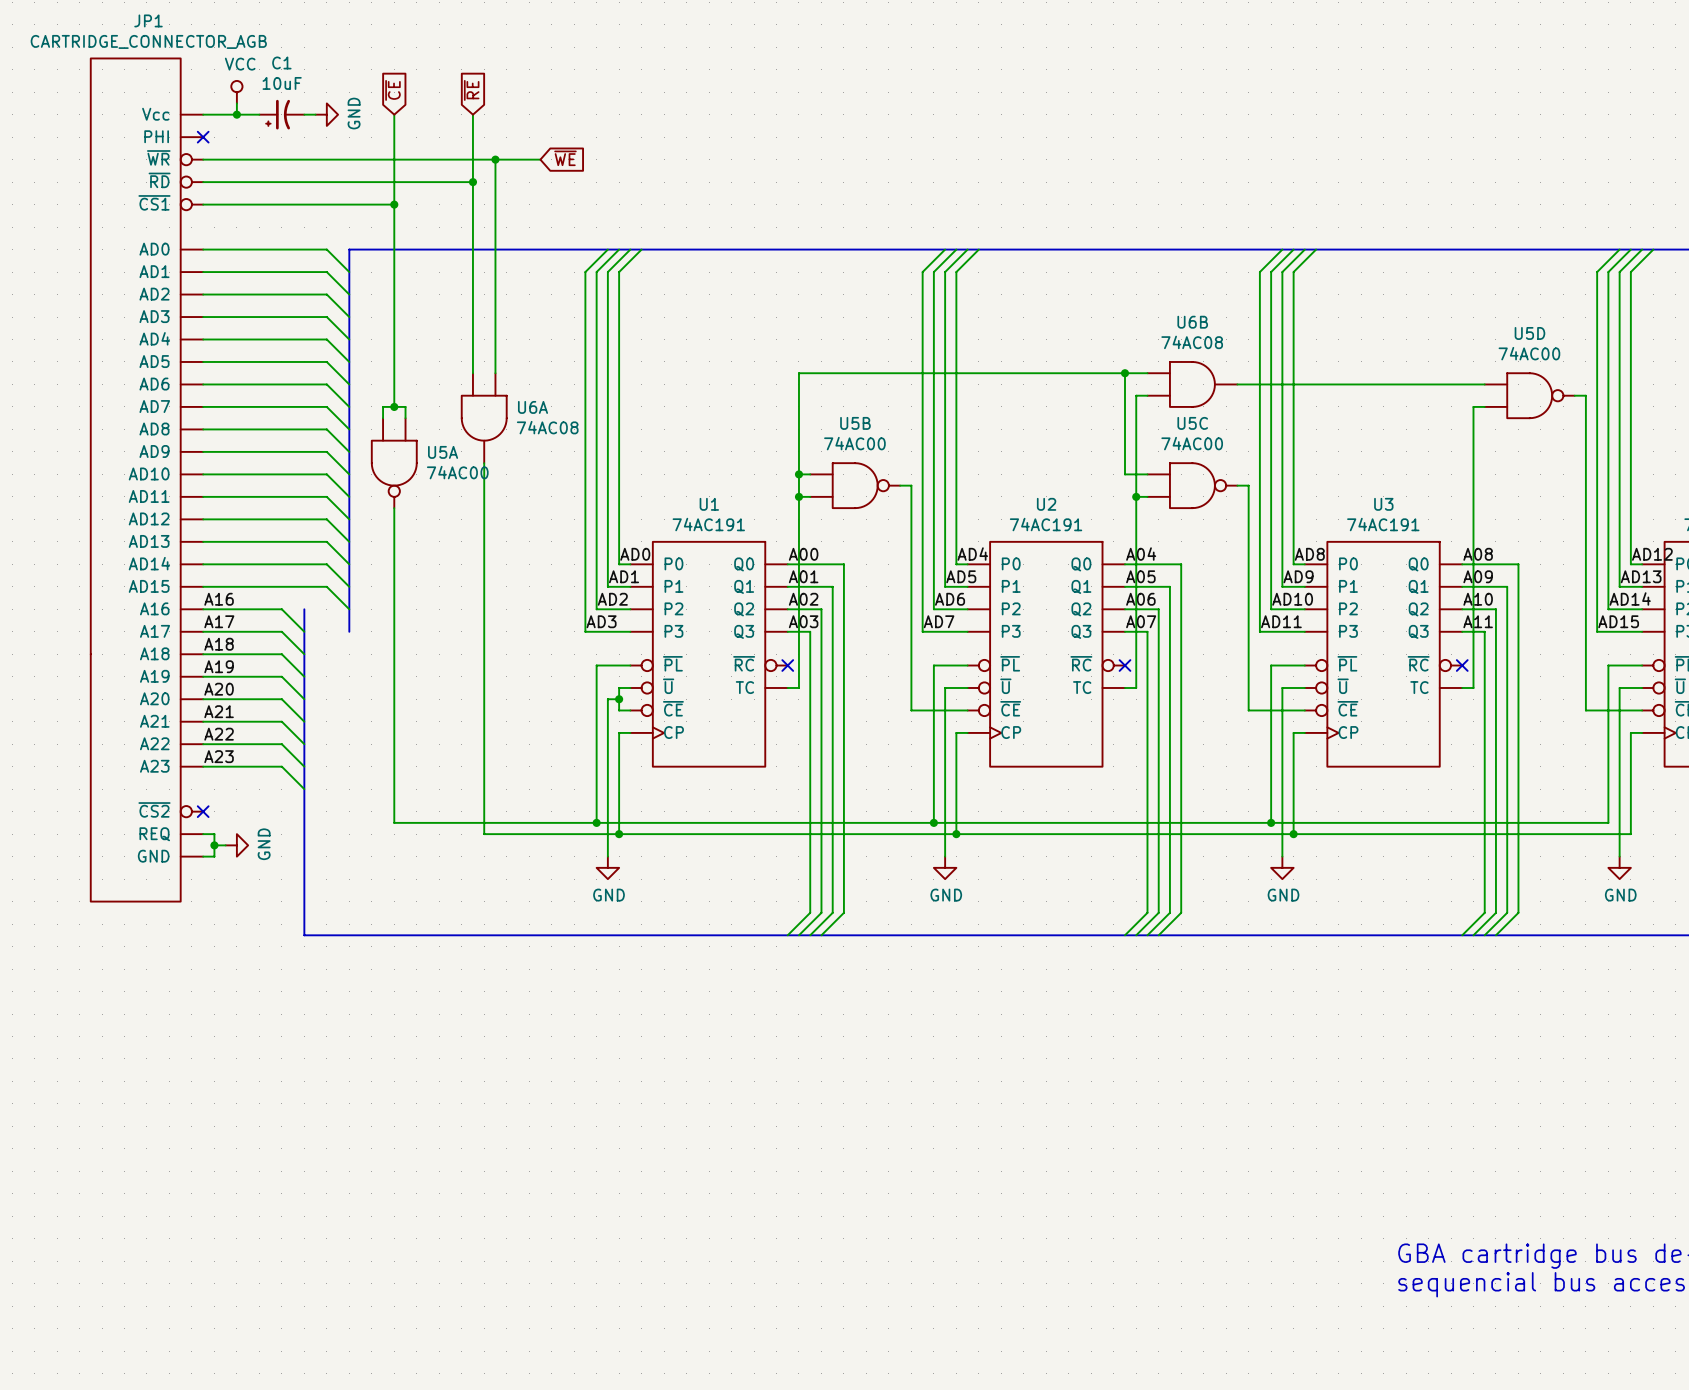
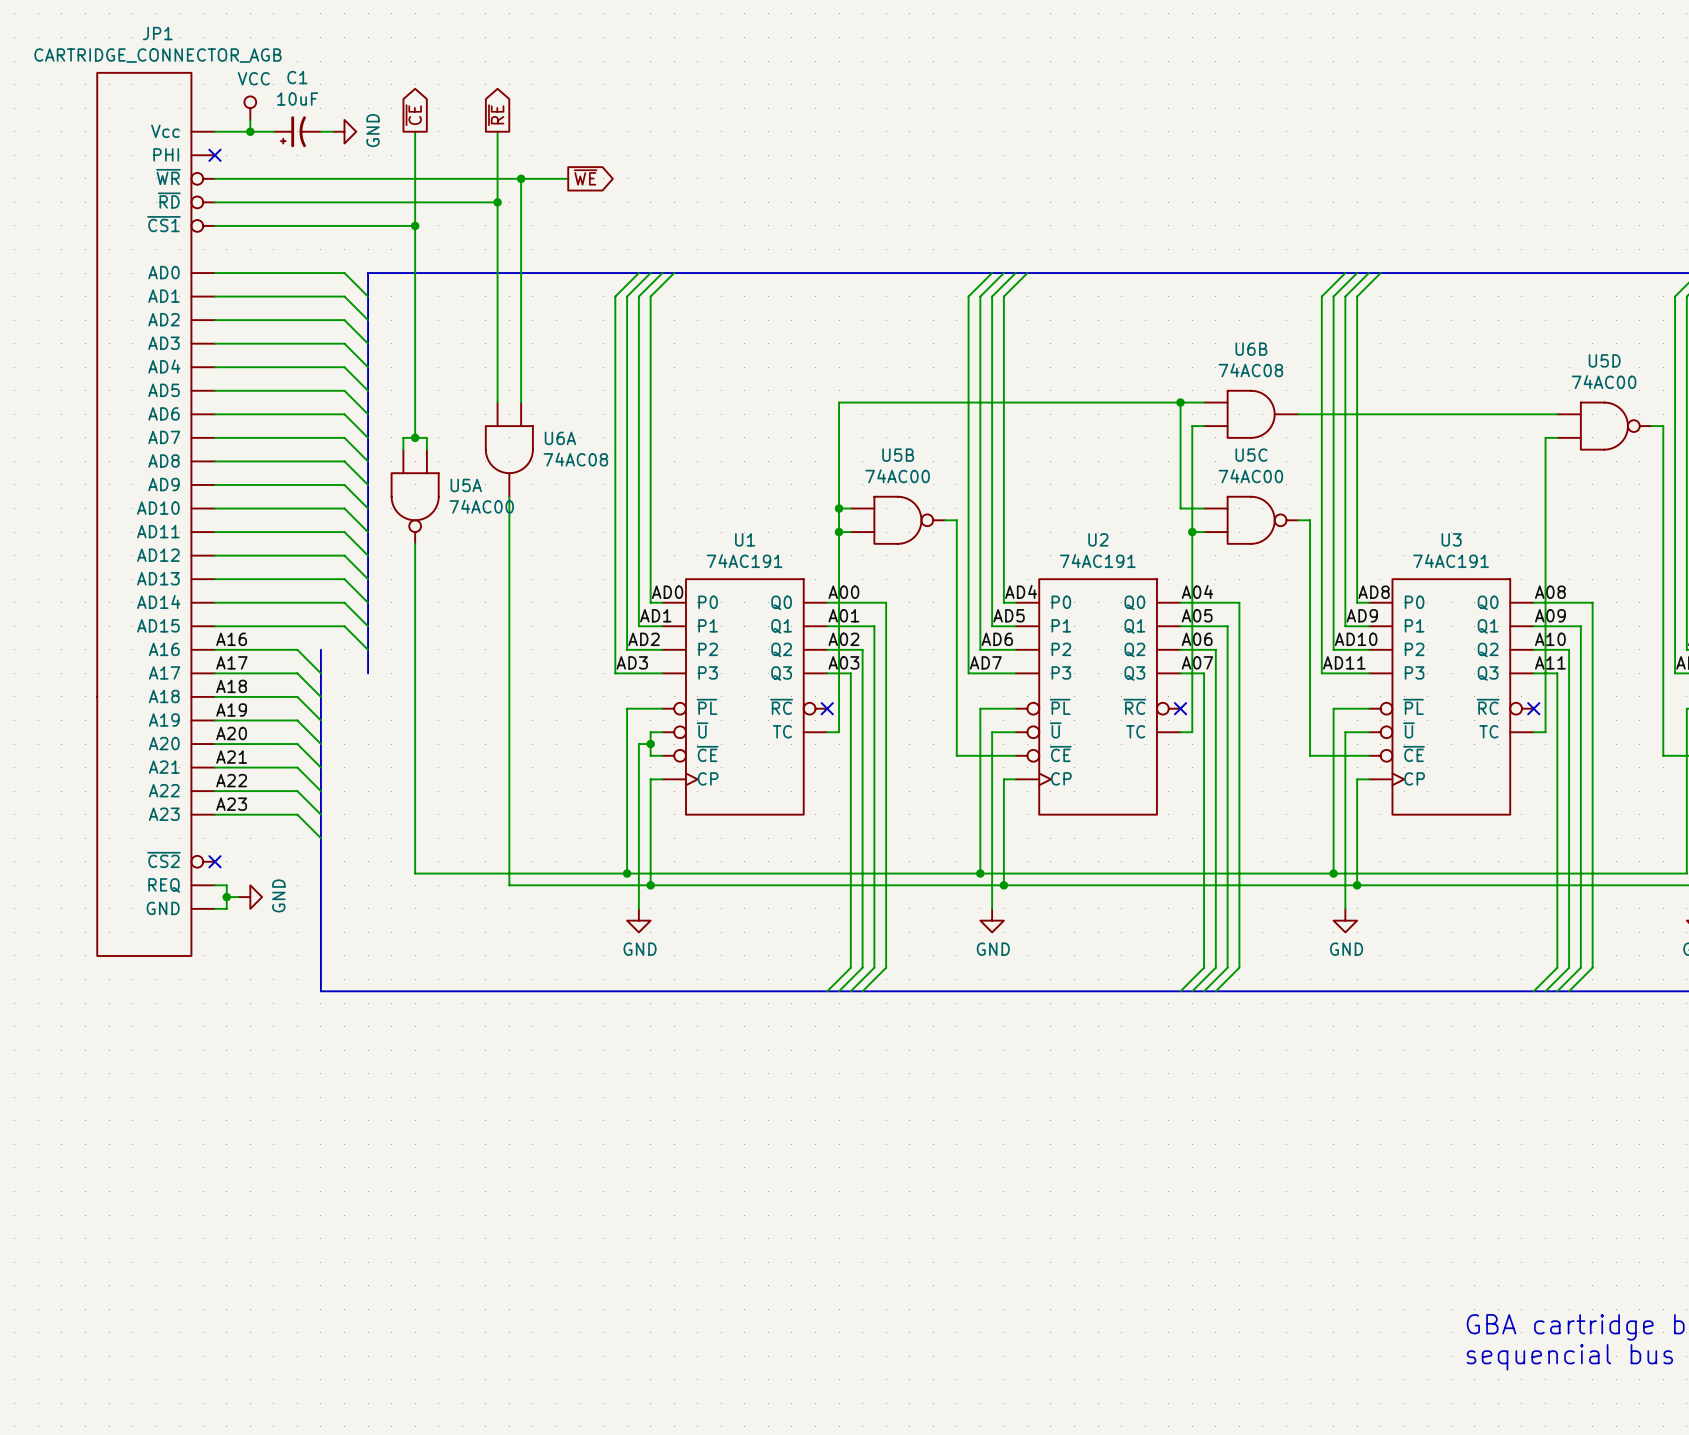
global label shape: input (392, 90) -> output (413, 115)
global label shape: input (471, 90) -> output (496, 115)
global label shape: input (565, 158) -> output (585, 177)

